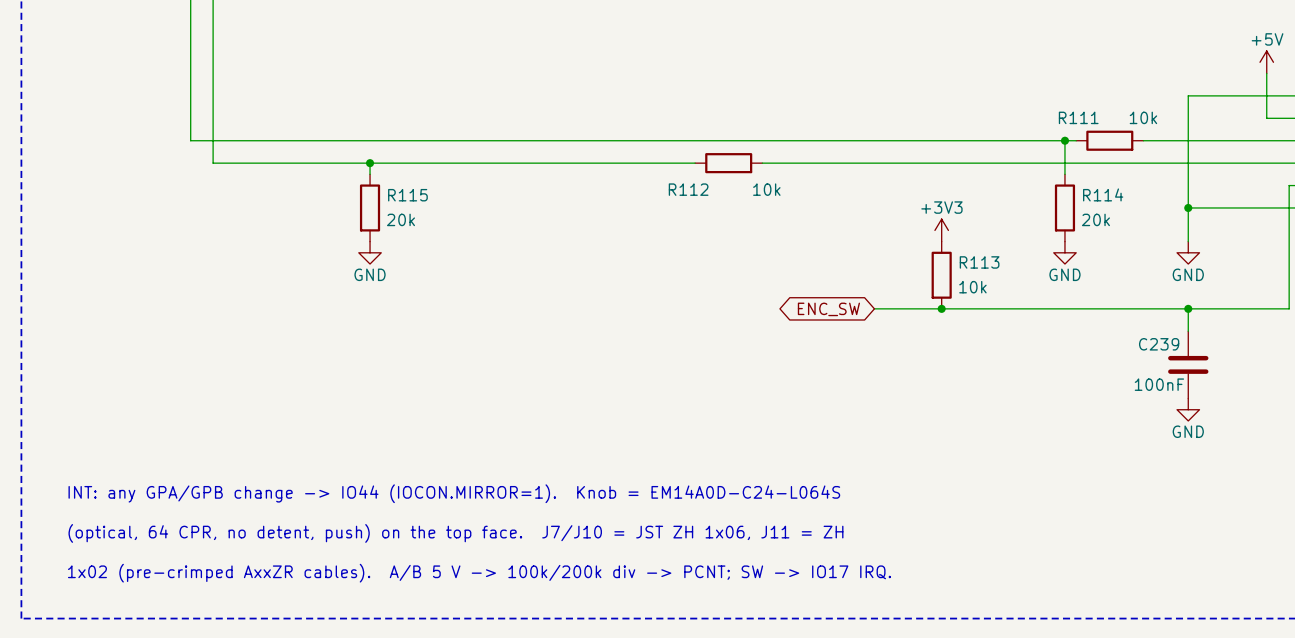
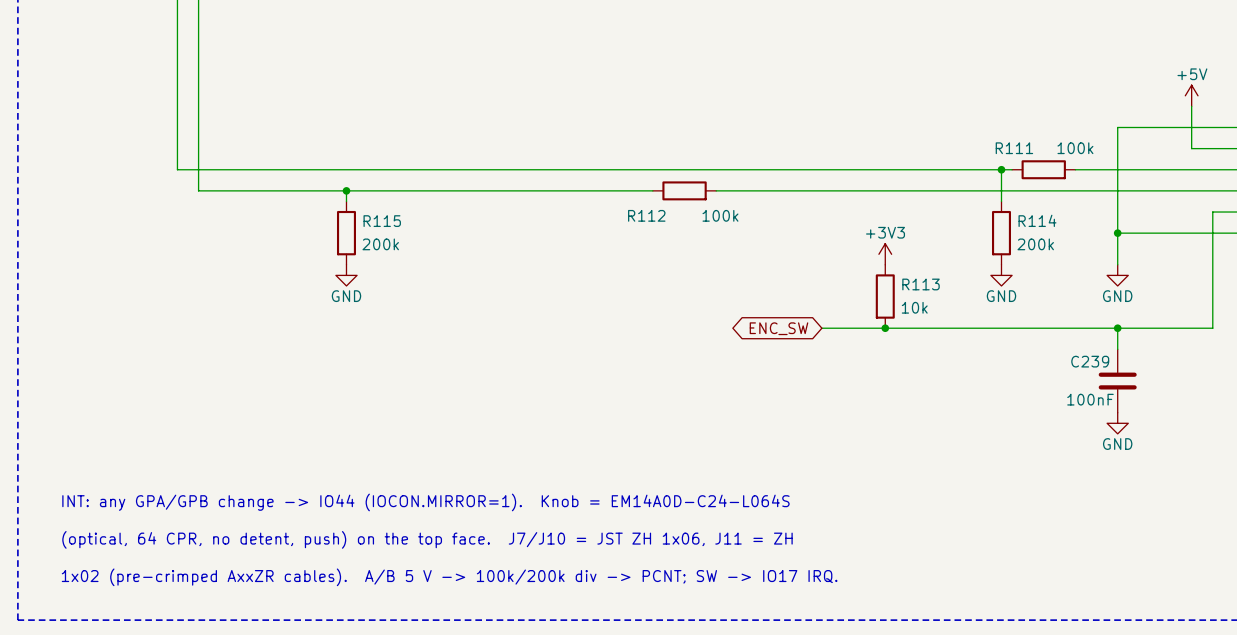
R111 value: 10k (1143, 117) -> 100k (1075, 148)
R112 value: 10k (766, 189) -> 100k (720, 215)
R115 value: 20k (401, 219) -> 200k (380, 244)
R114 value: 20k (1095, 219) -> 200k (1035, 244)

